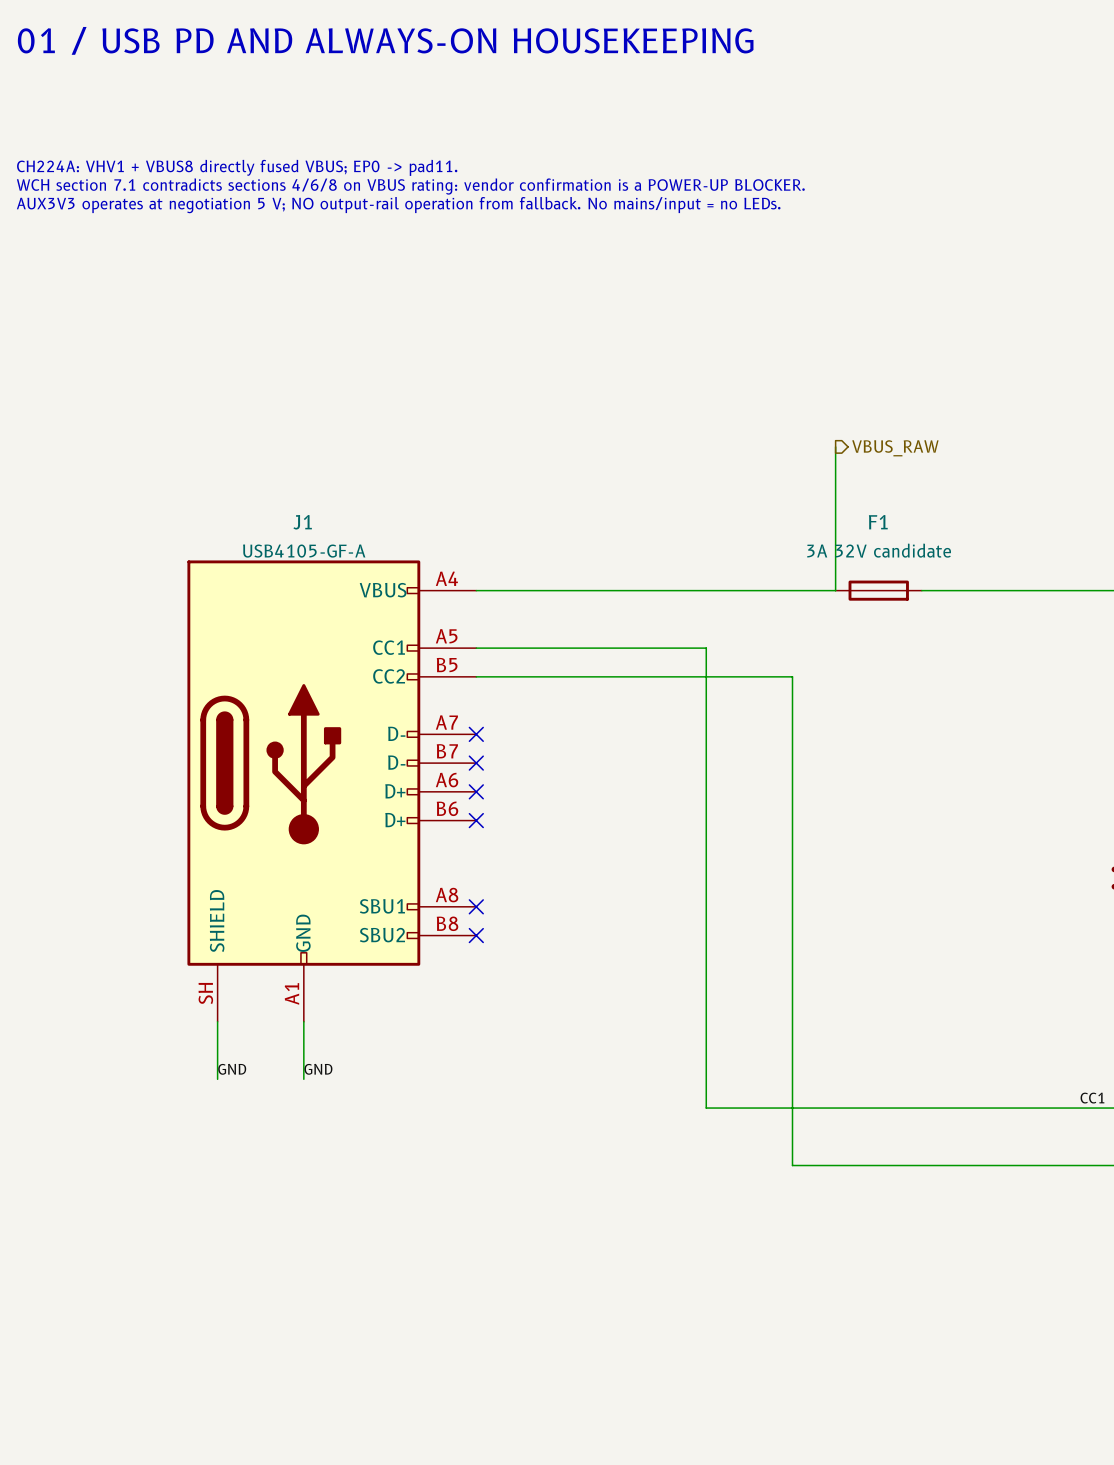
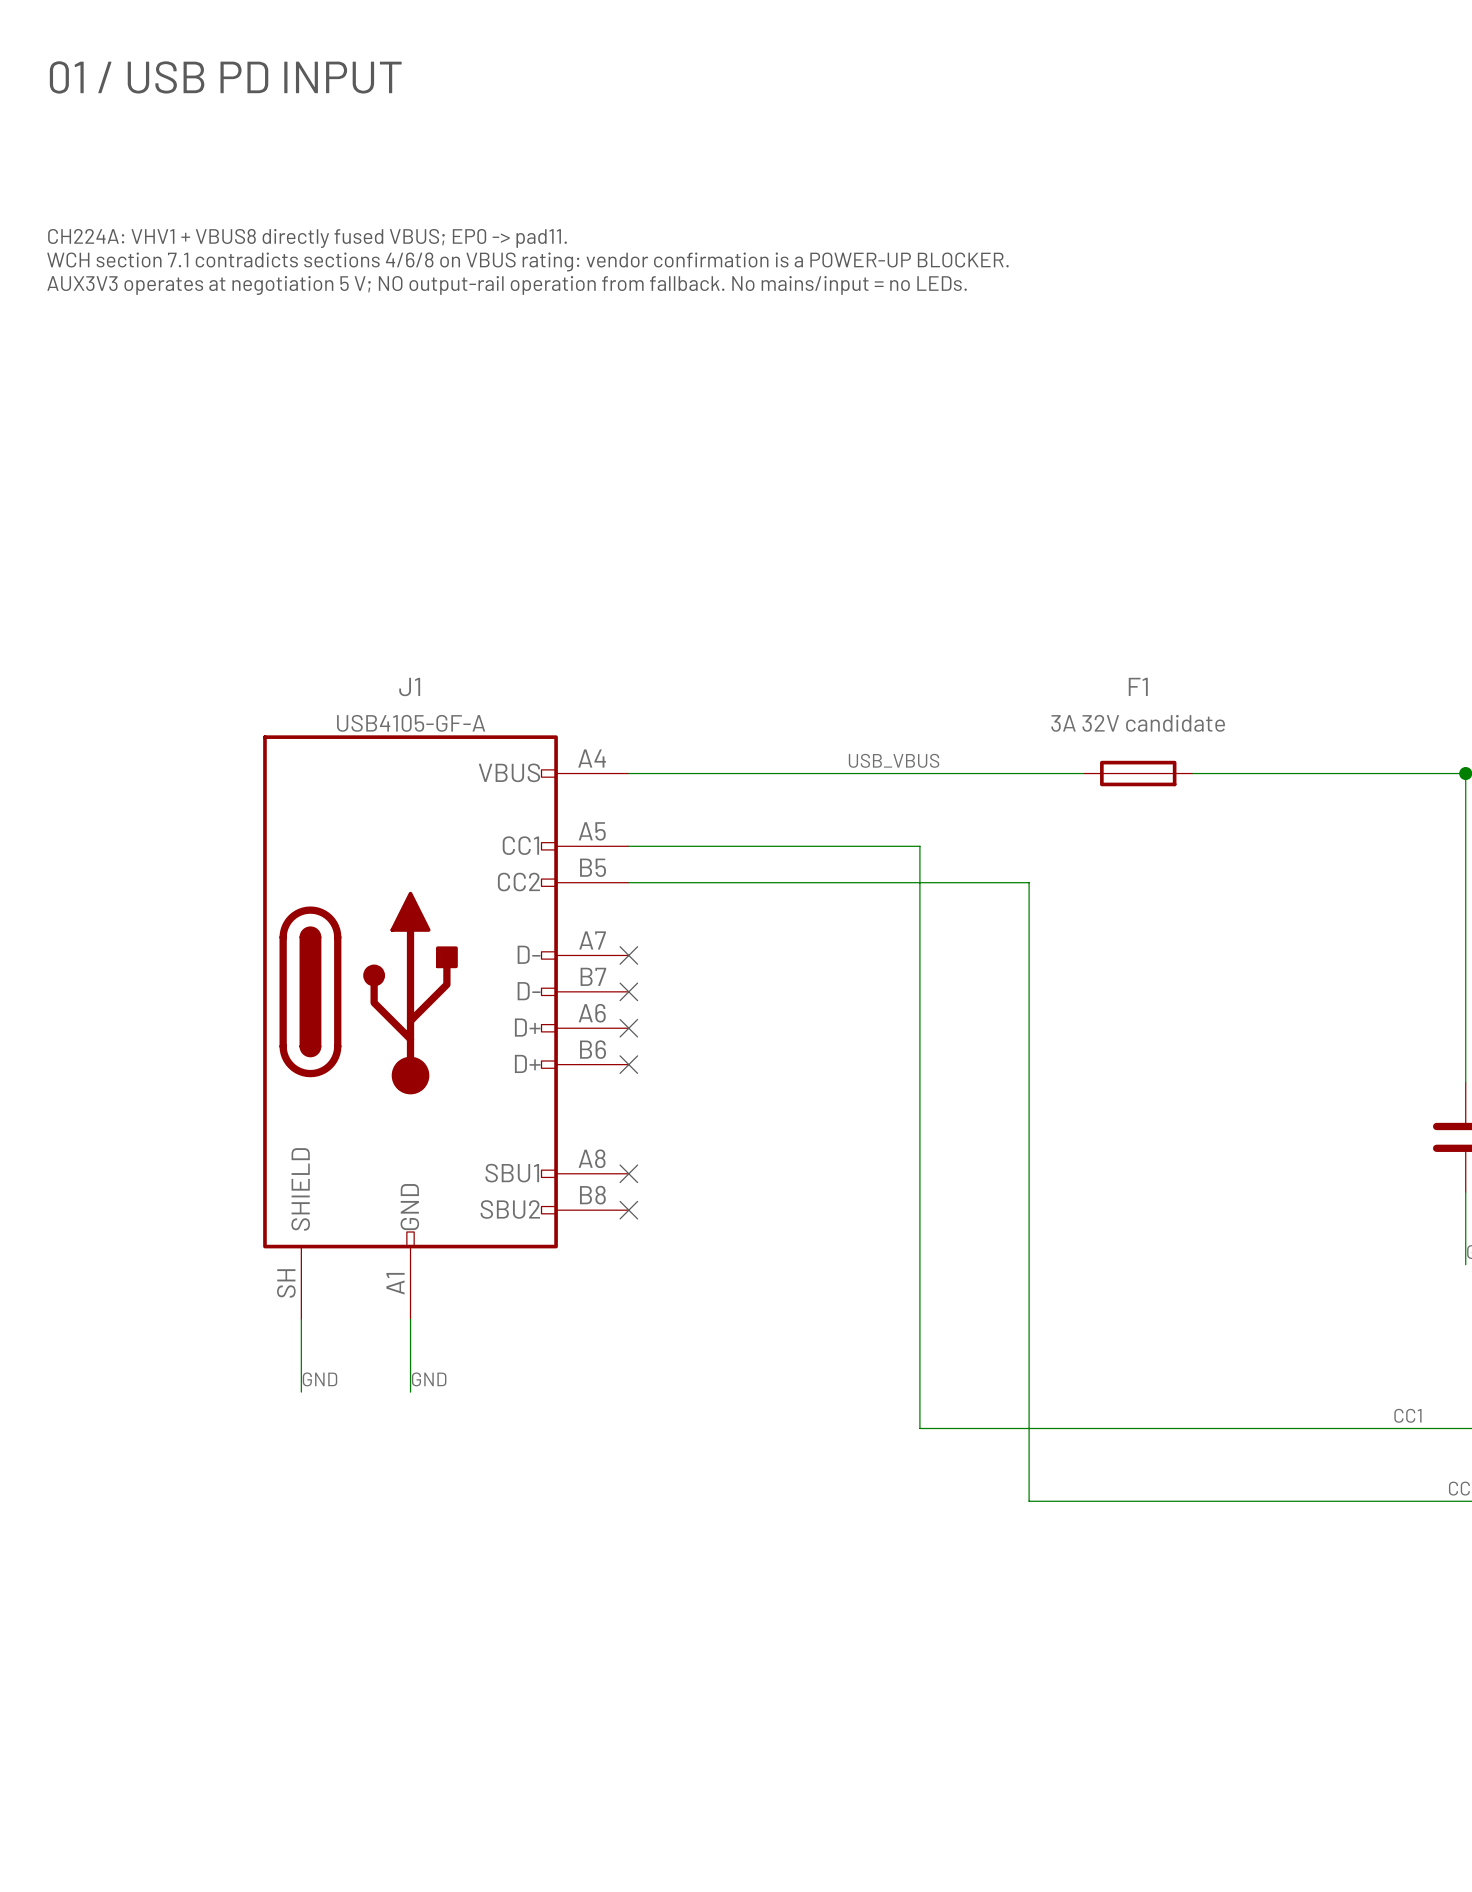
text: 01 / USB PD AND ALWAYS-ON HOUSEKEEPING (385, 40) -> 01 / USB PD INPUT (225, 77)
wire: (835, 446) (835, 590) -> none
hierarchical label: VBUS_RAW (895, 448) -> none
label: none -> USB_VBUS (894, 760)

